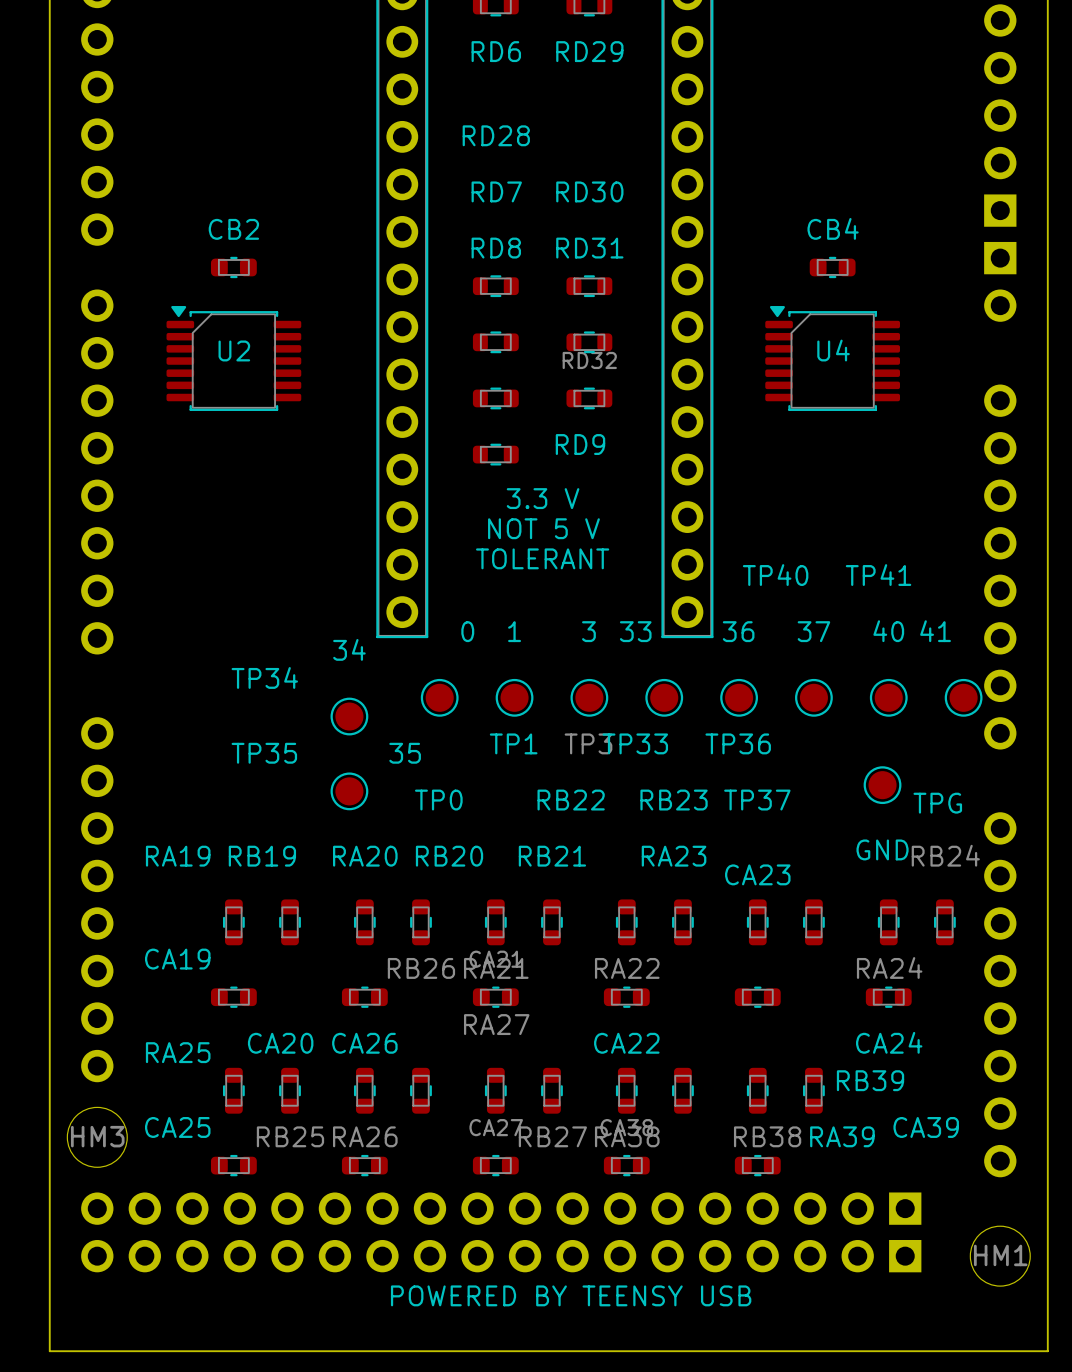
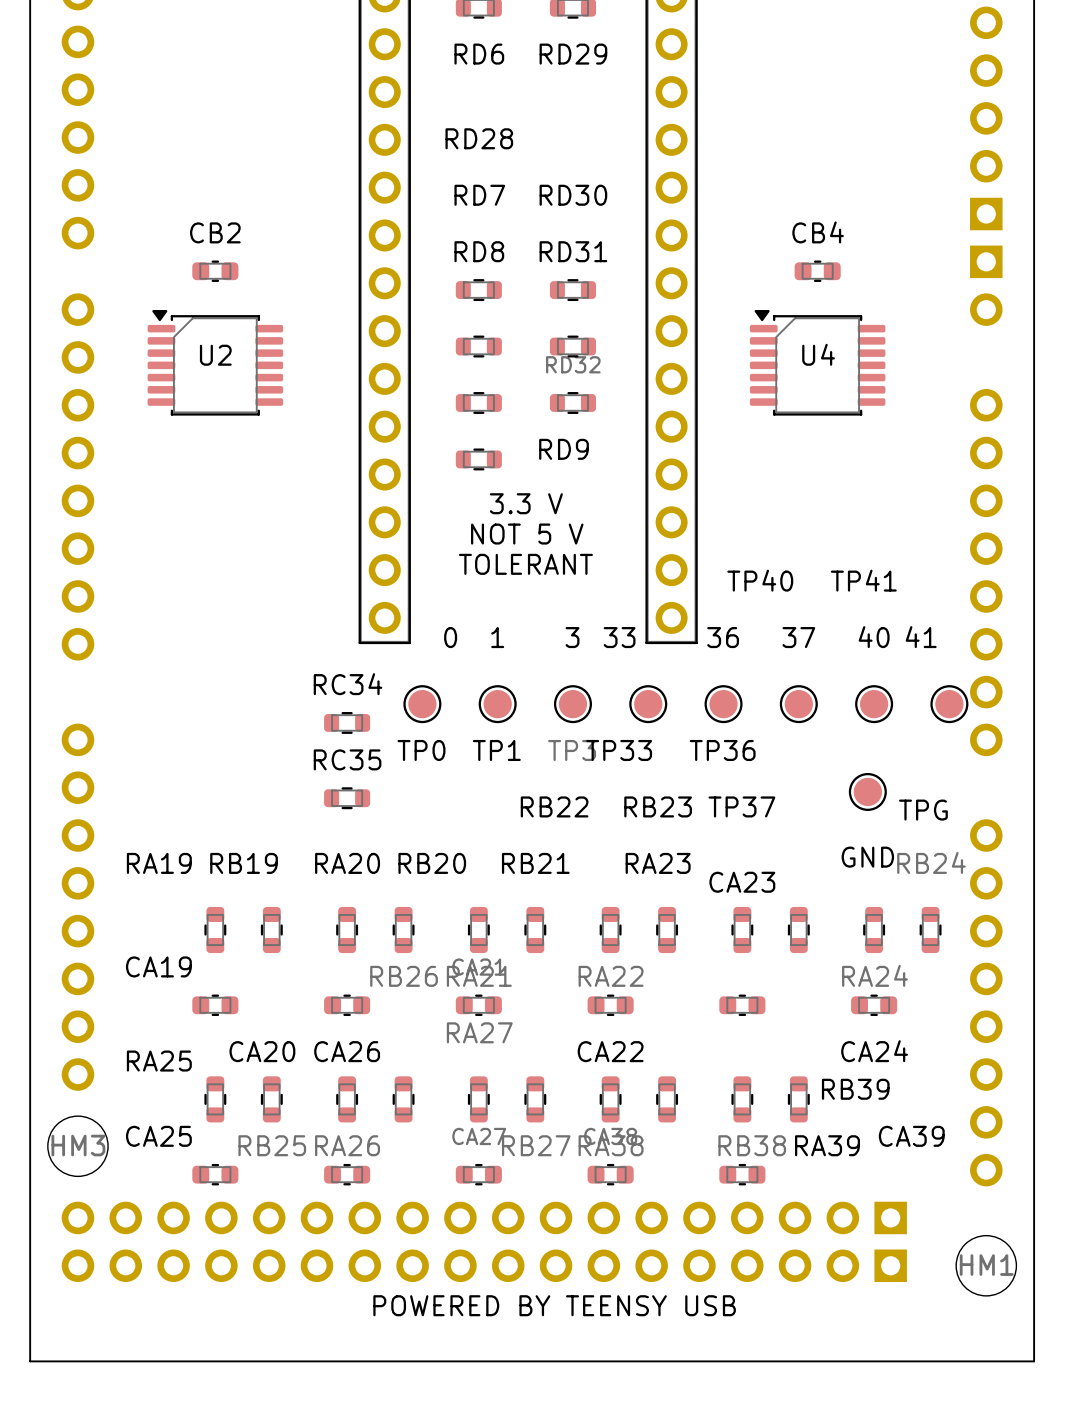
text: 34 (349, 649) -> none
TP34: (349, 716) -> none
RC34: none -> (347, 722)
text: 35 (405, 753) -> none
TP35: (349, 791) -> none
RC35: none -> (347, 798)
TP0 name position: TP0 (438, 800) -> TP0 (421, 750)

